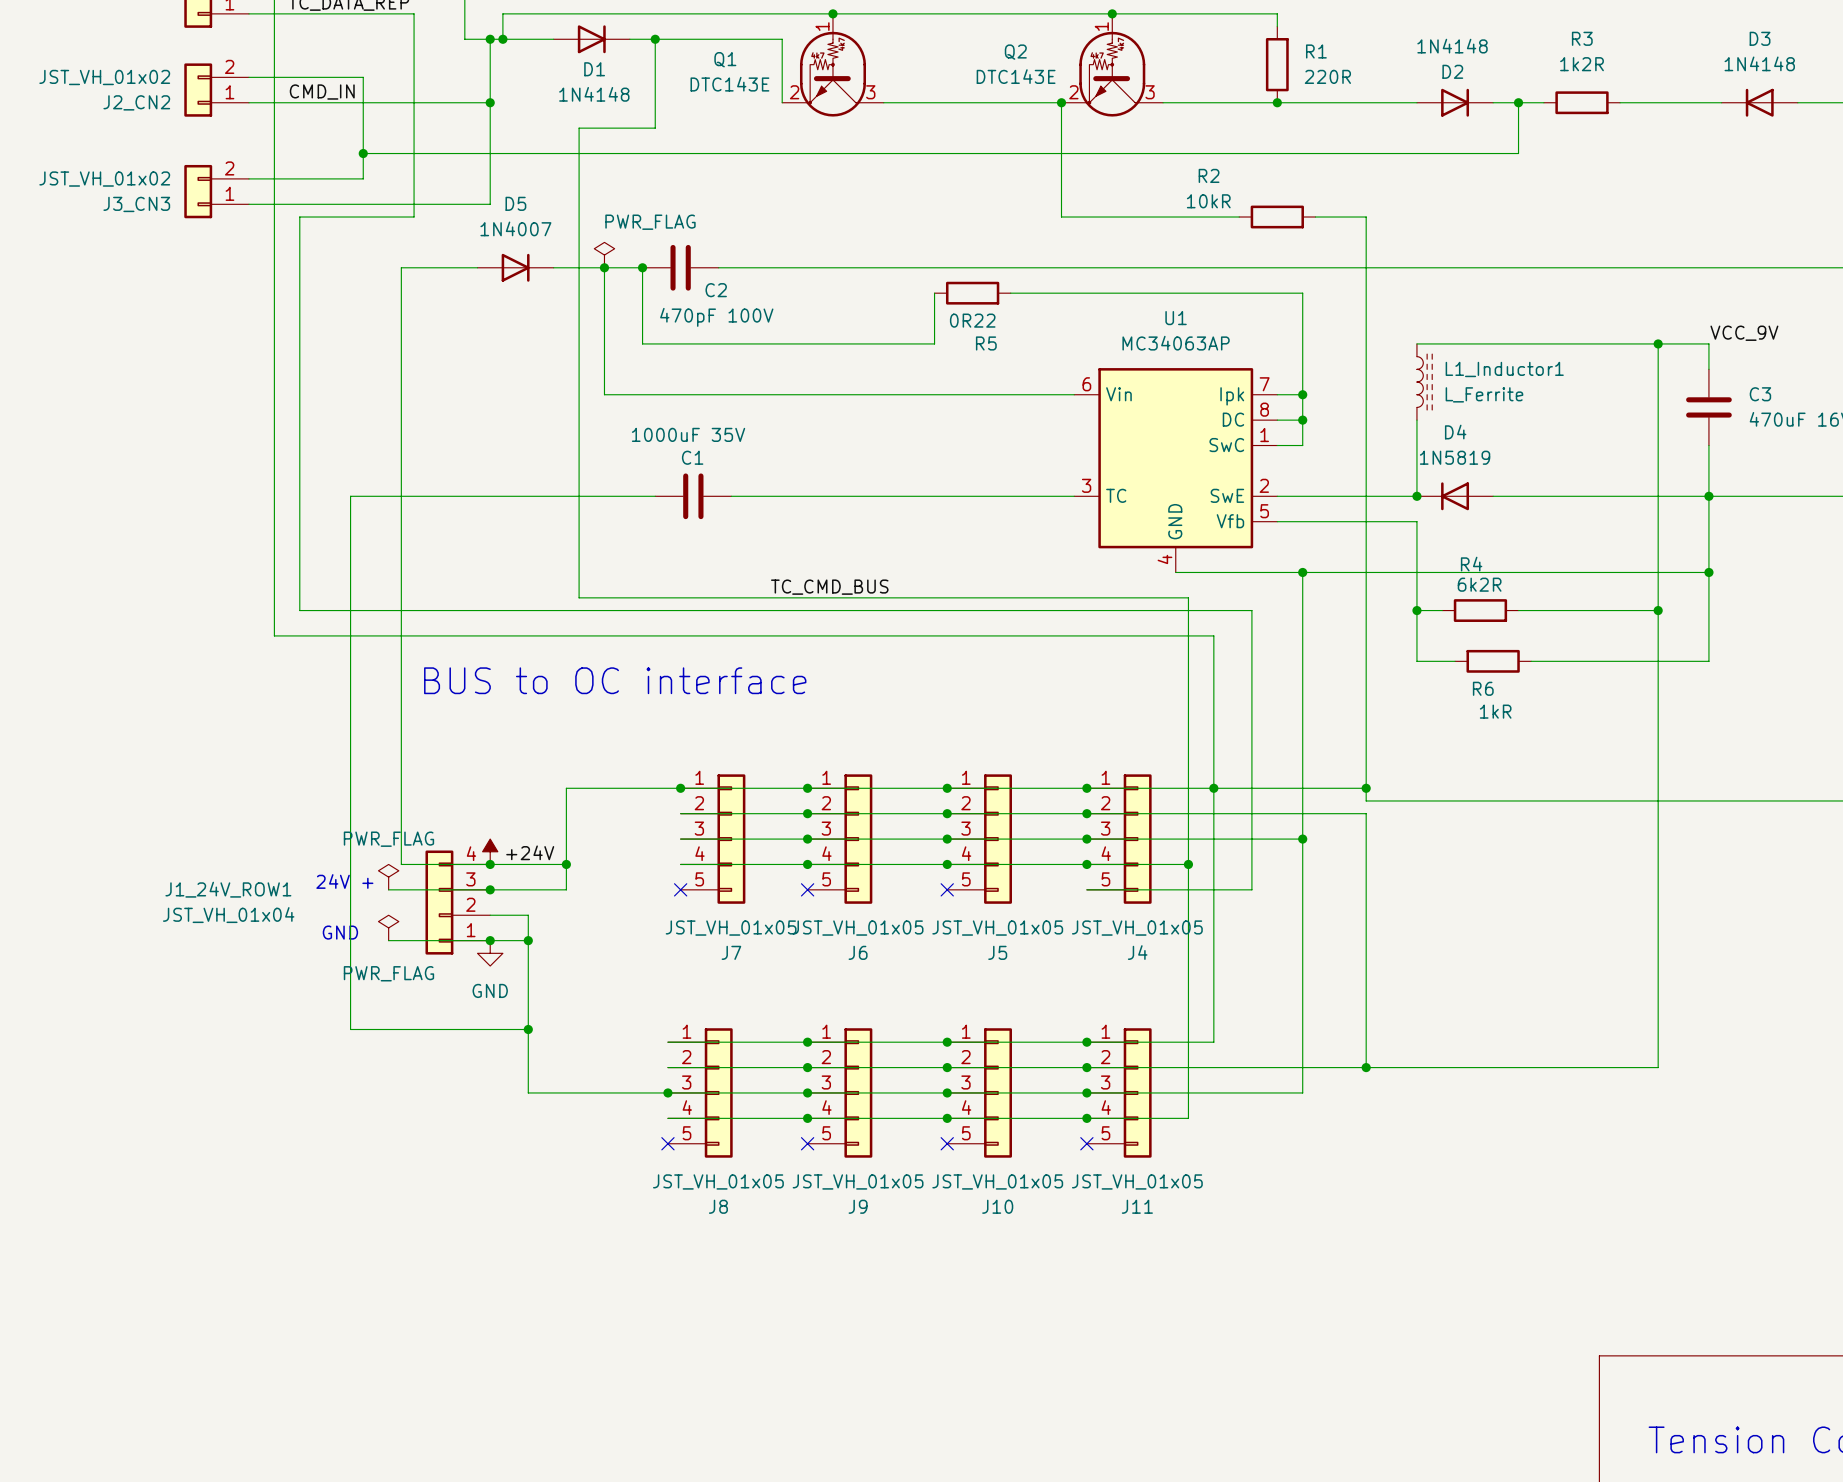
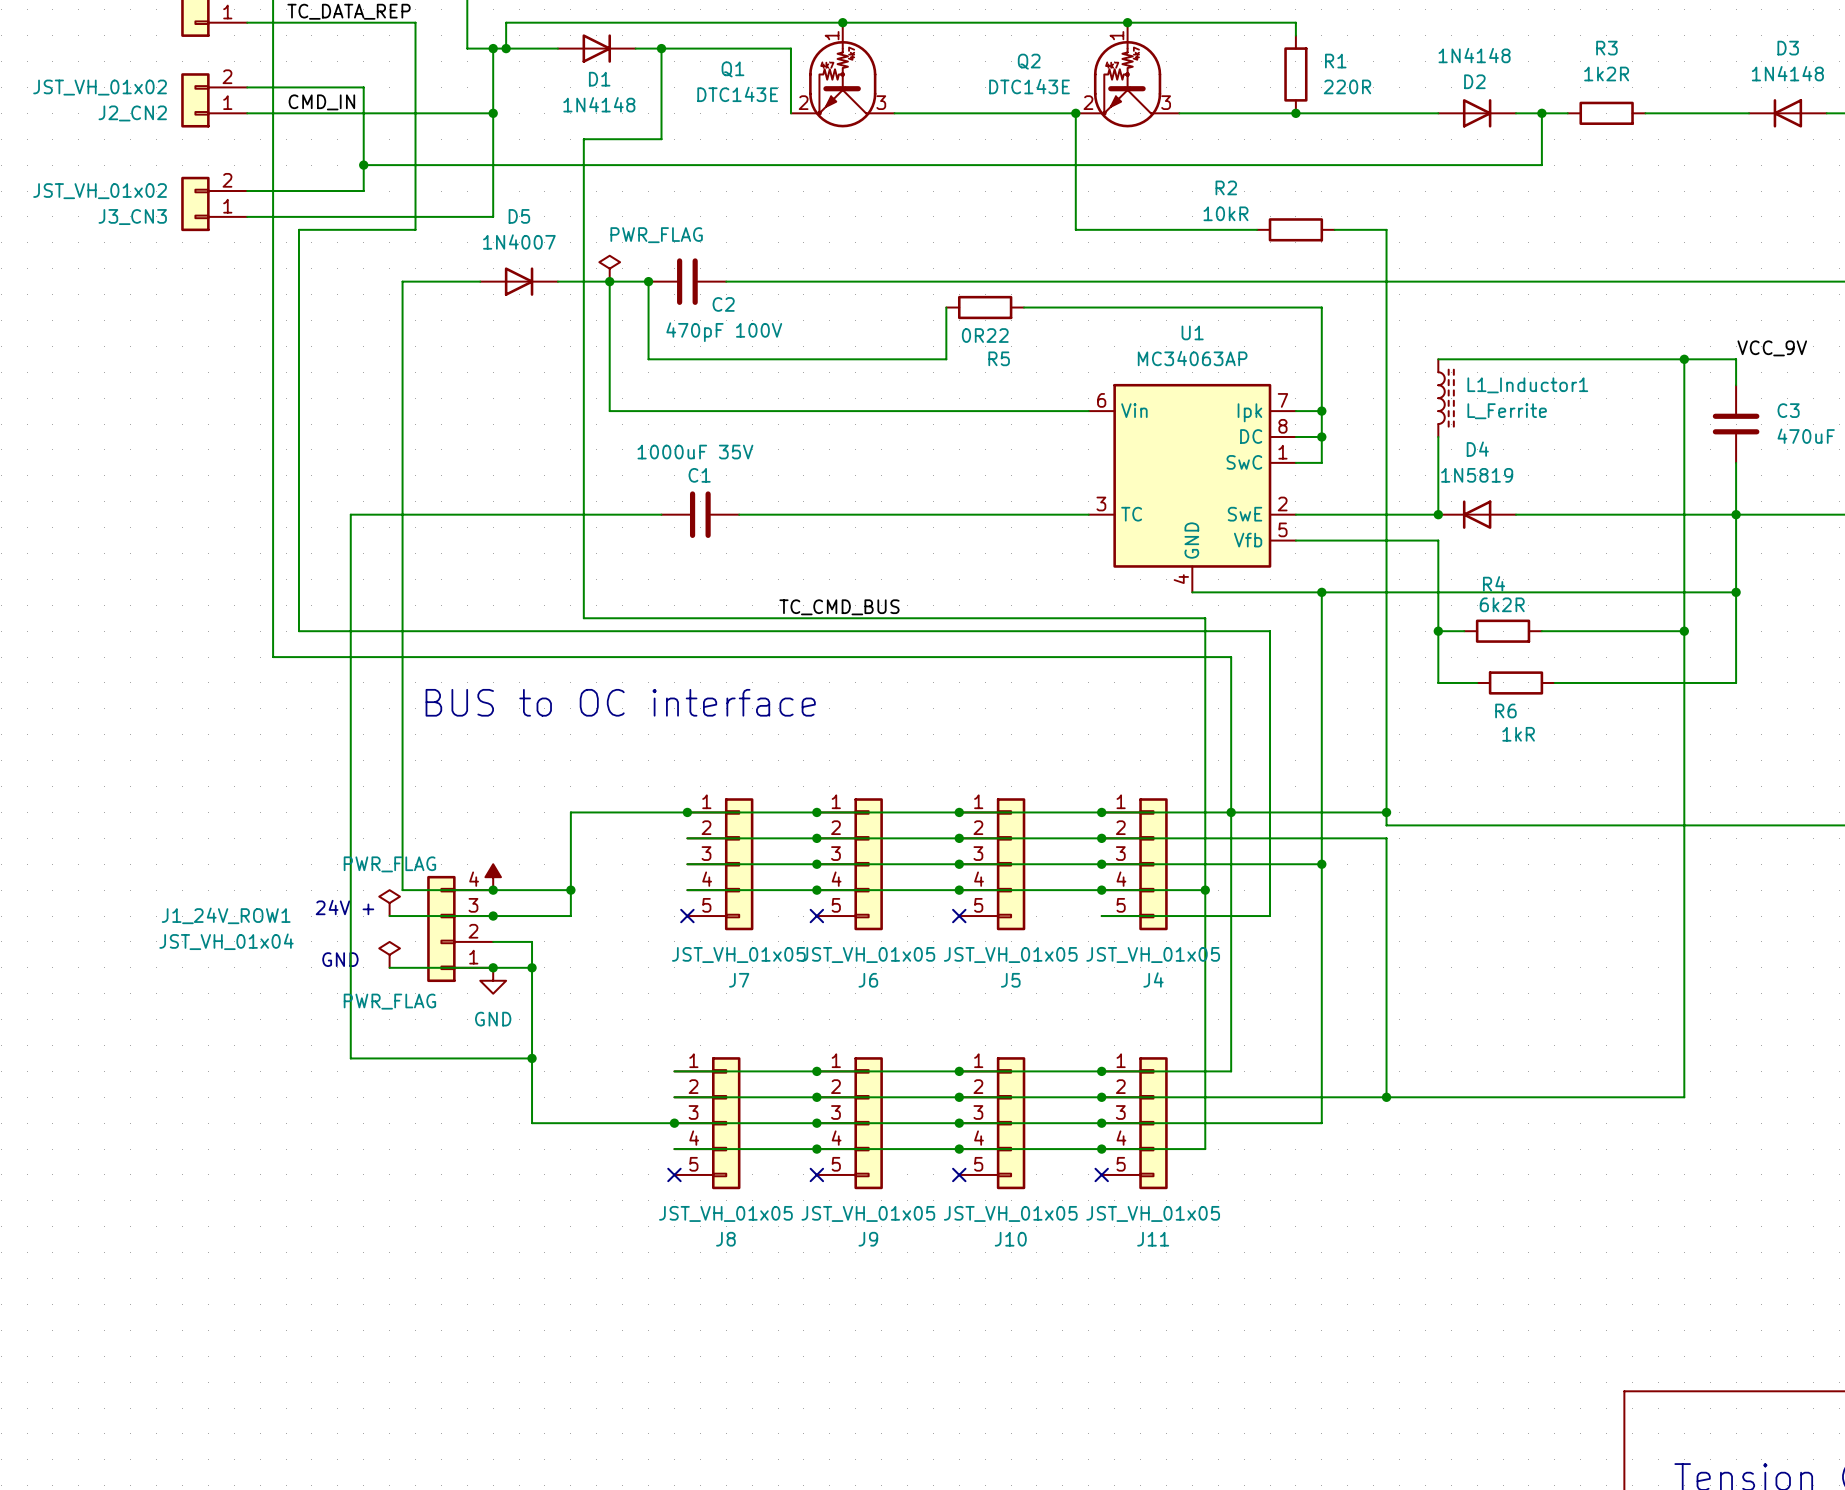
label: +24V (530, 852) -> none

